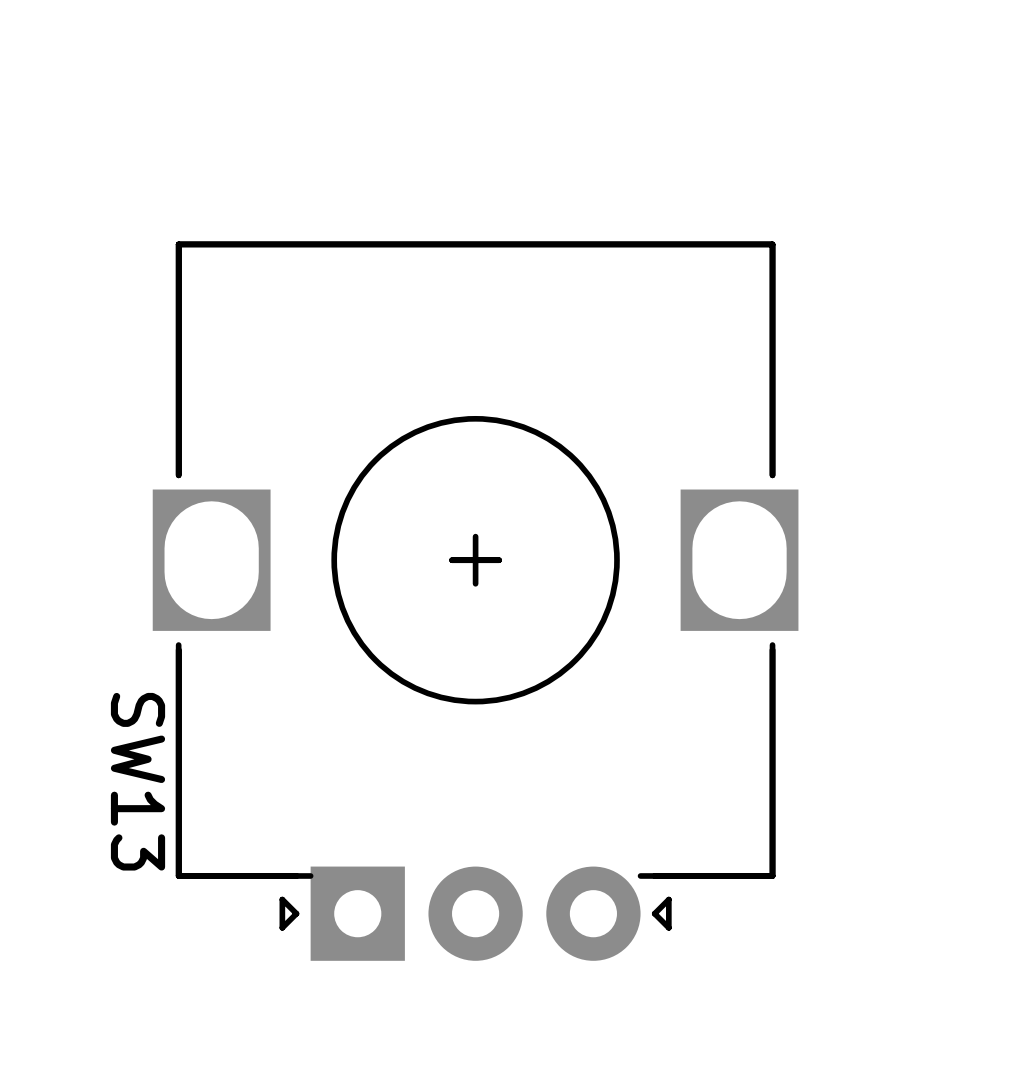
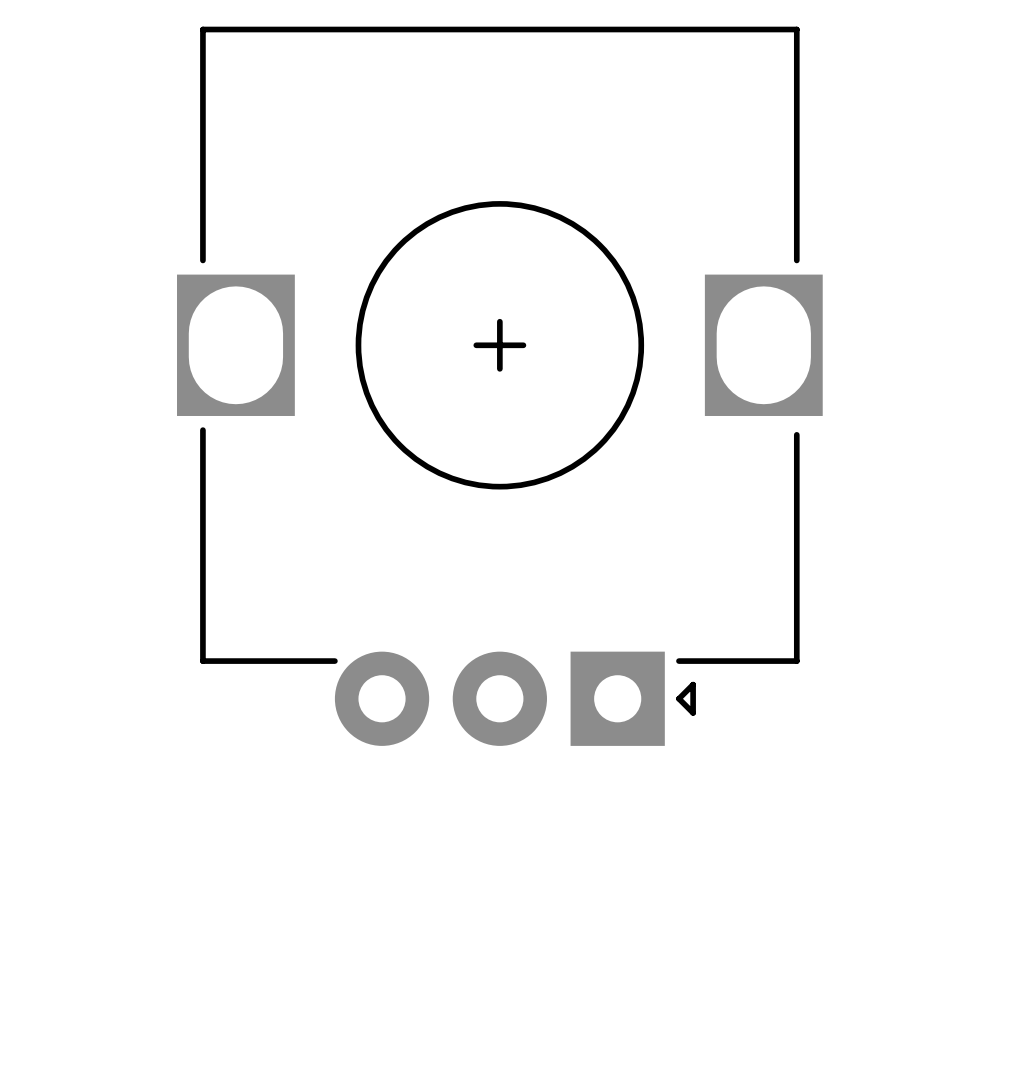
SW13 side: bottom (475, 601) -> top (499, 386)

